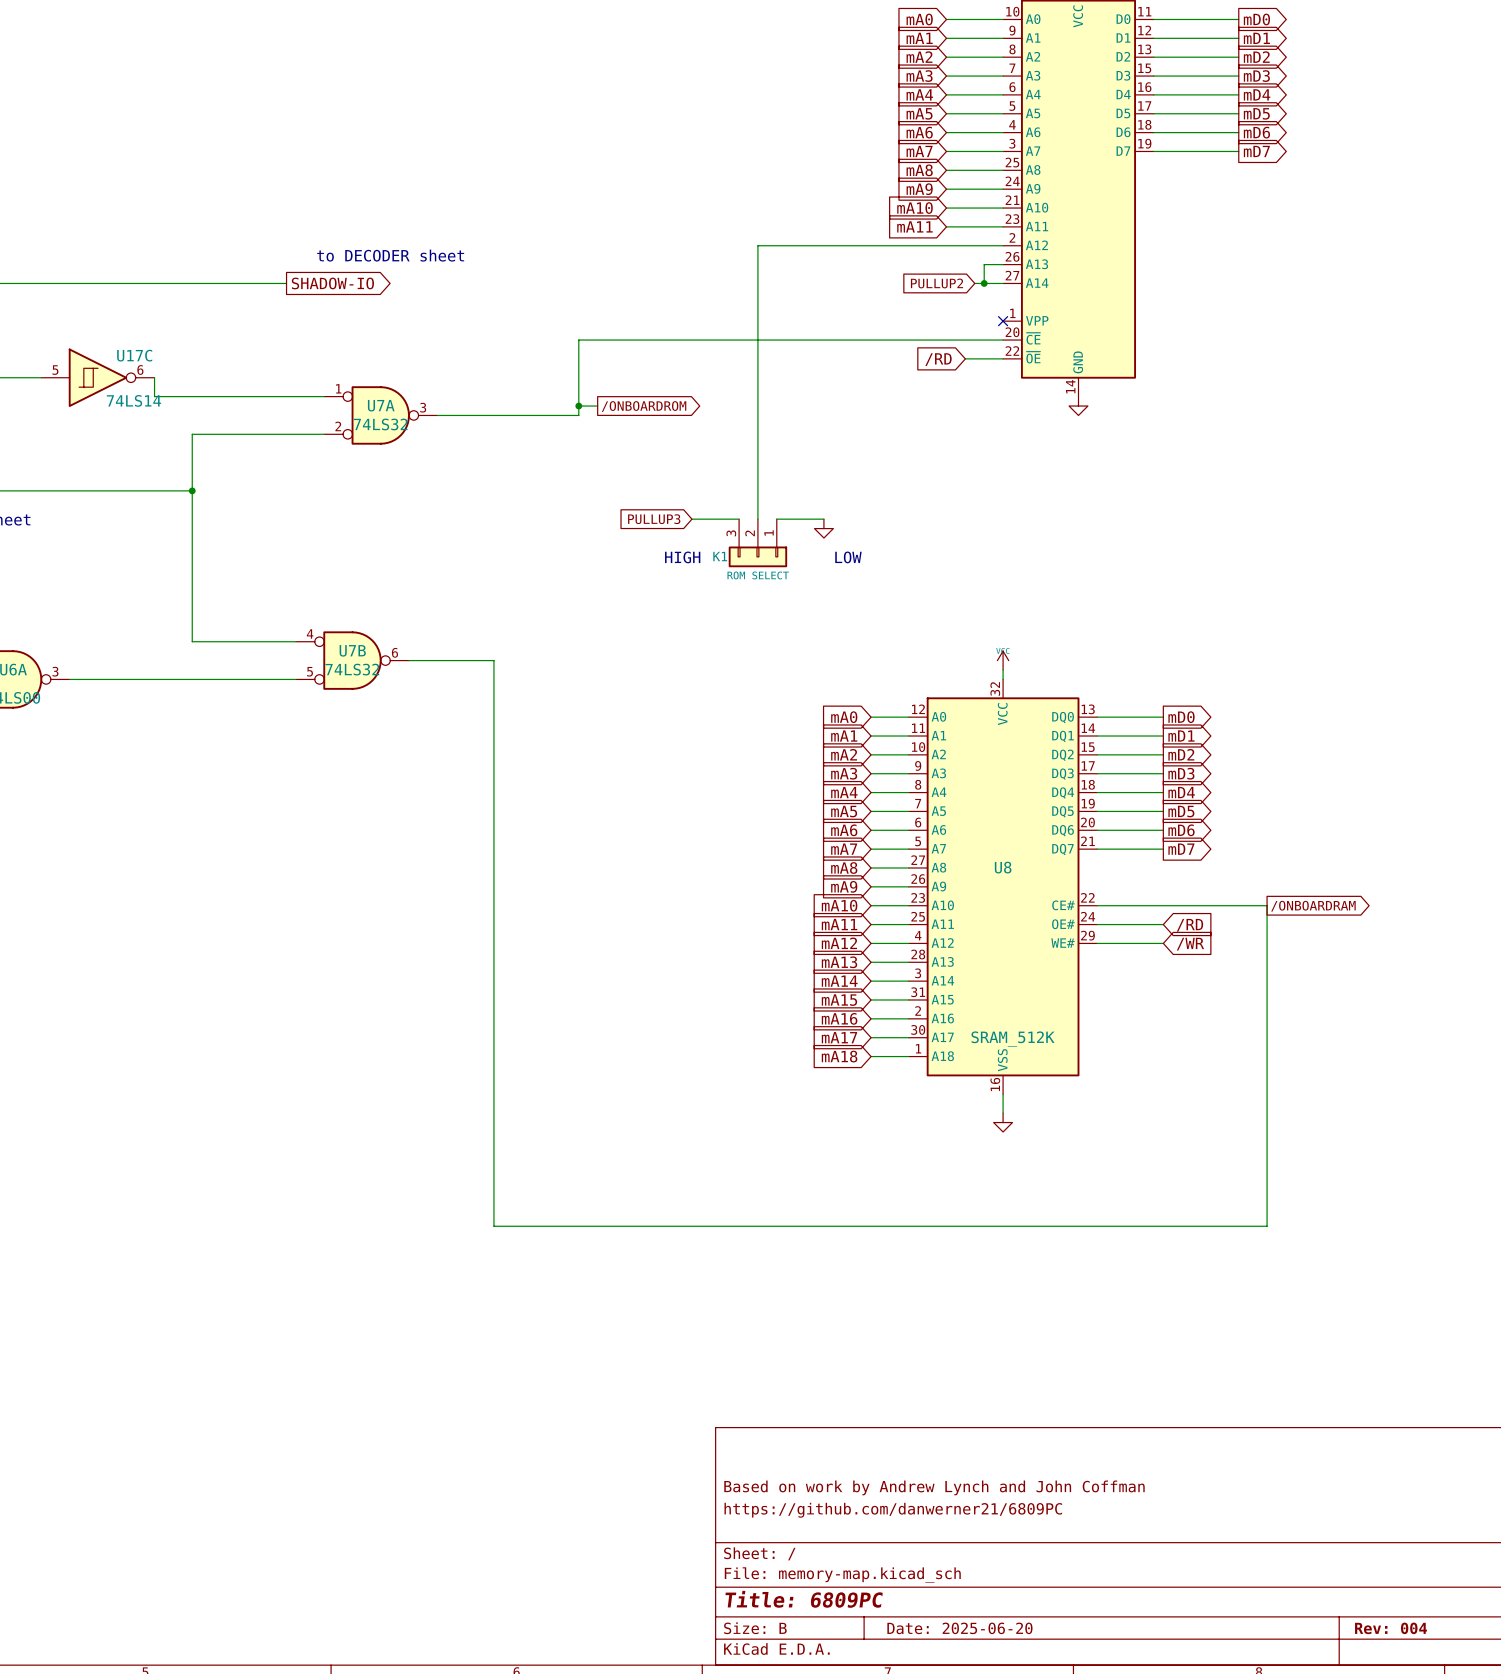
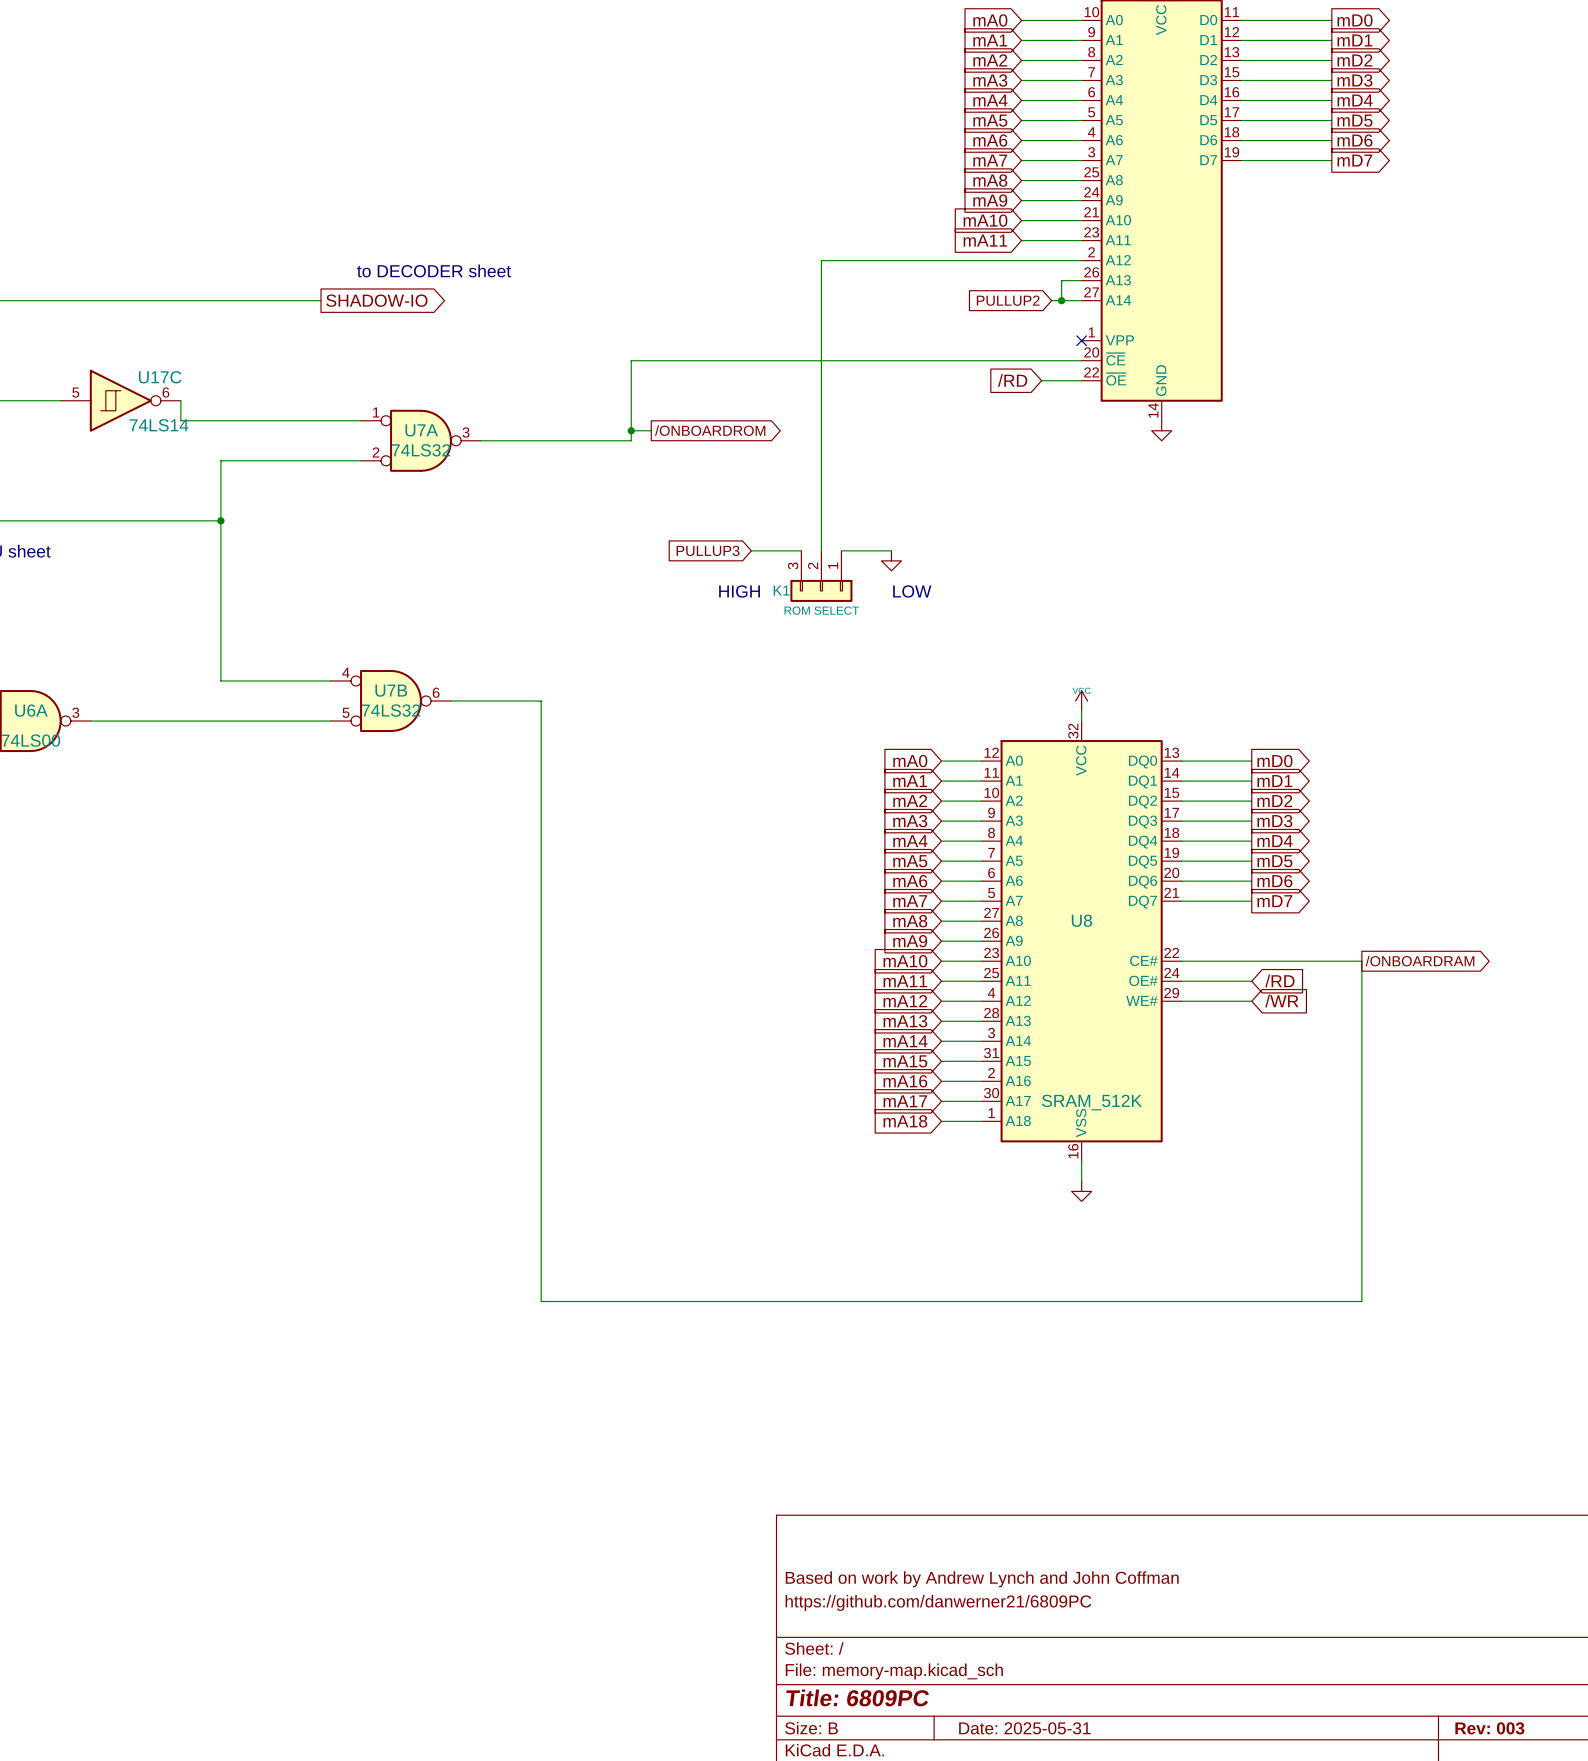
title block: Date: 2025-06-20 (959, 1628) -> Date: 2025-05-31 (1024, 1728)
title block: Rev: 004 (1390, 1628) -> Rev: 003 (1489, 1728)

